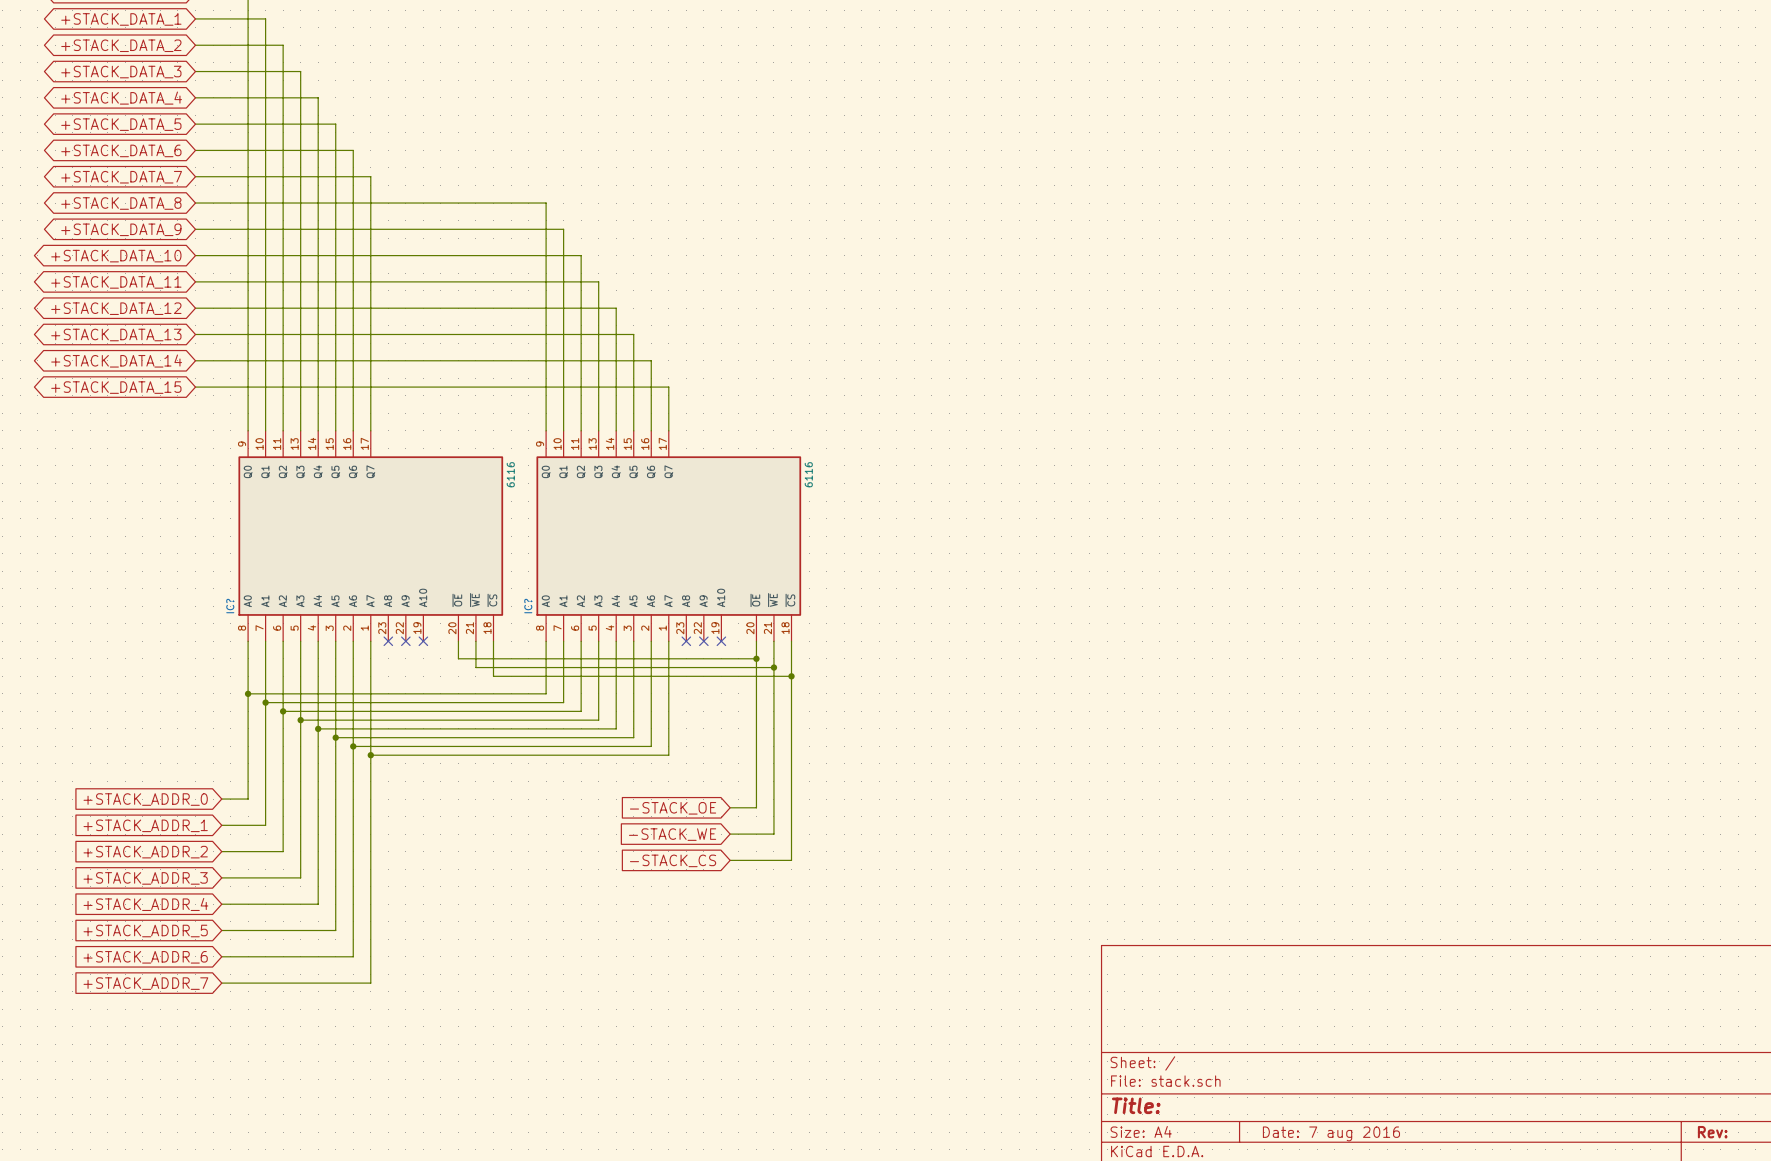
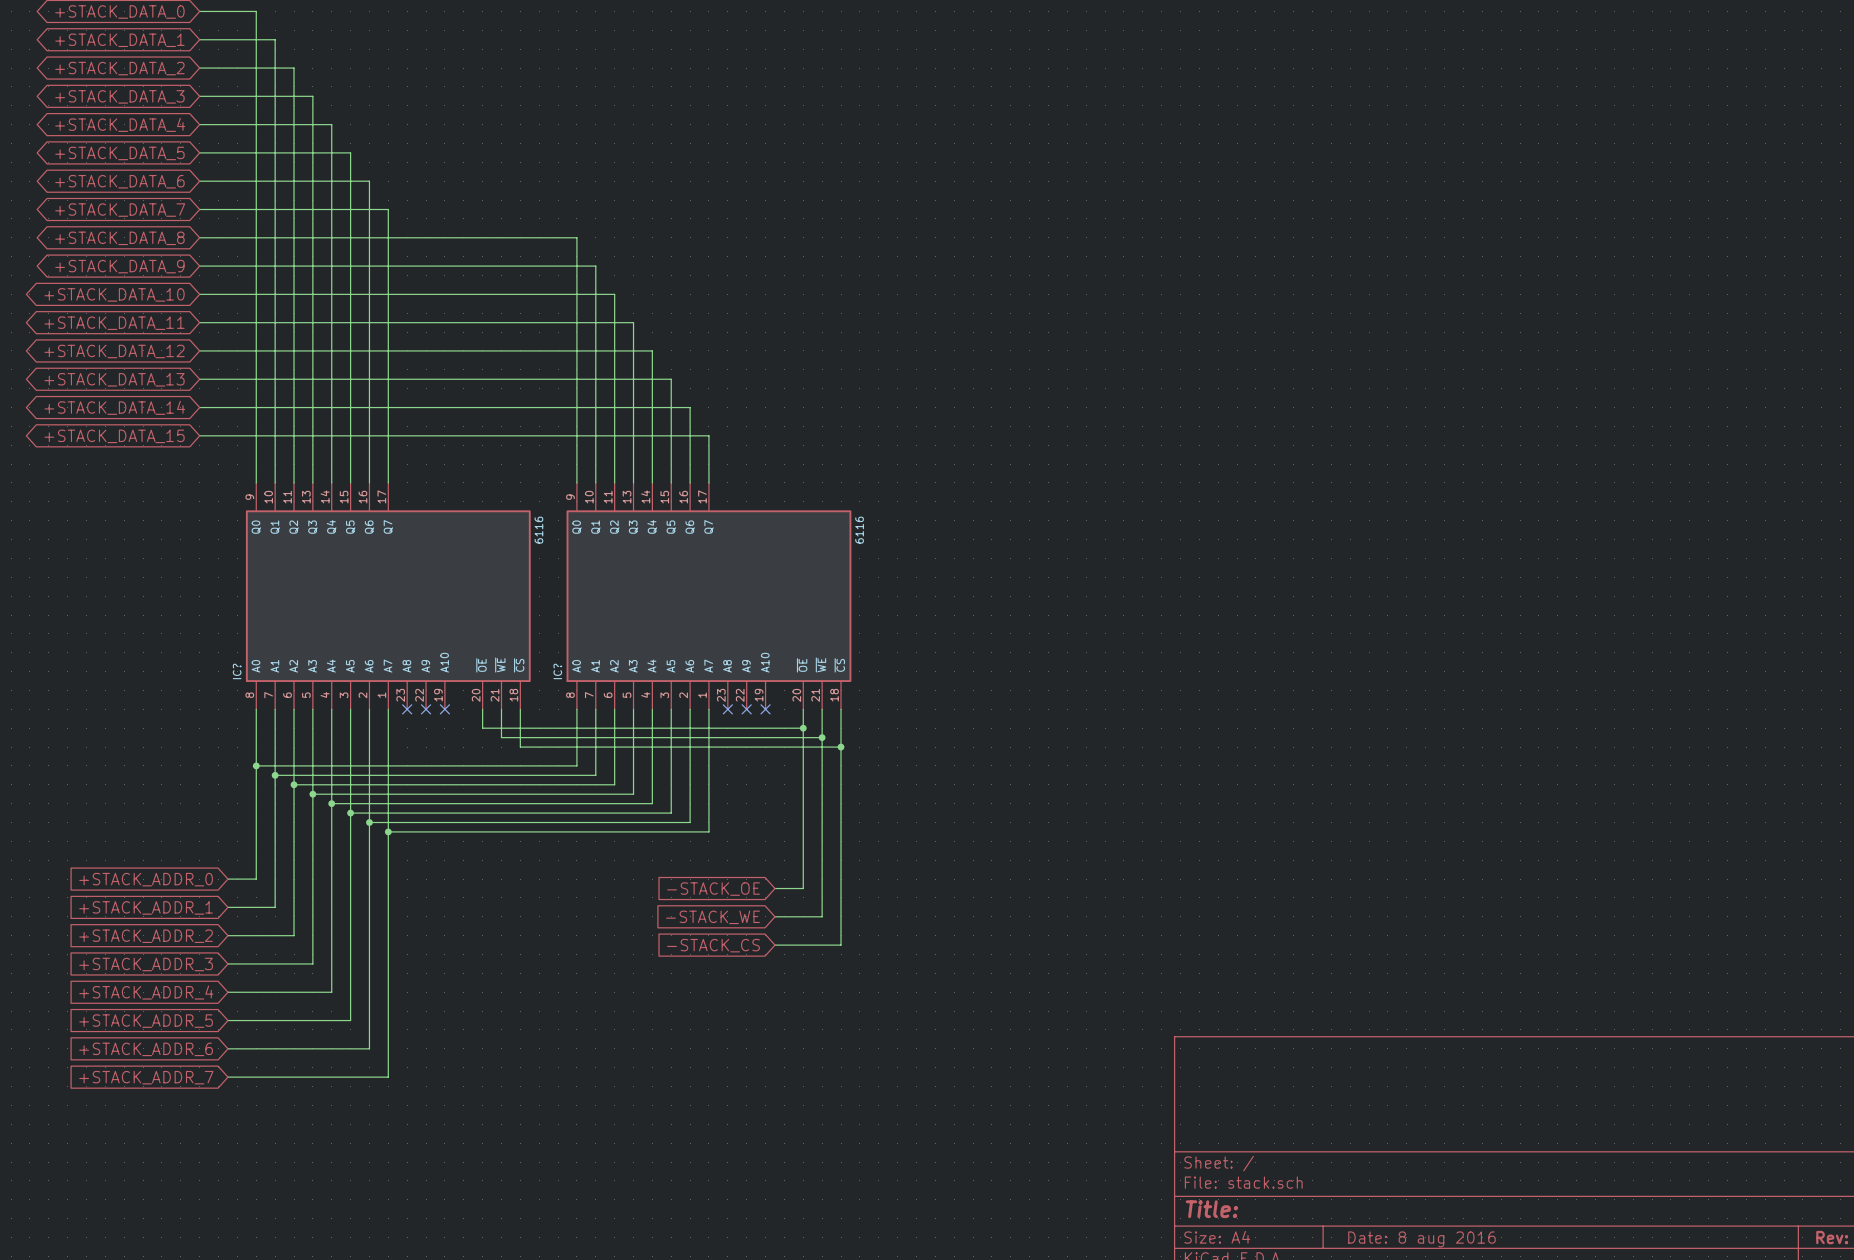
title block: Date: 7 aug 2016 (1331, 1133) -> Date: 8 aug 2016 (1421, 1239)

